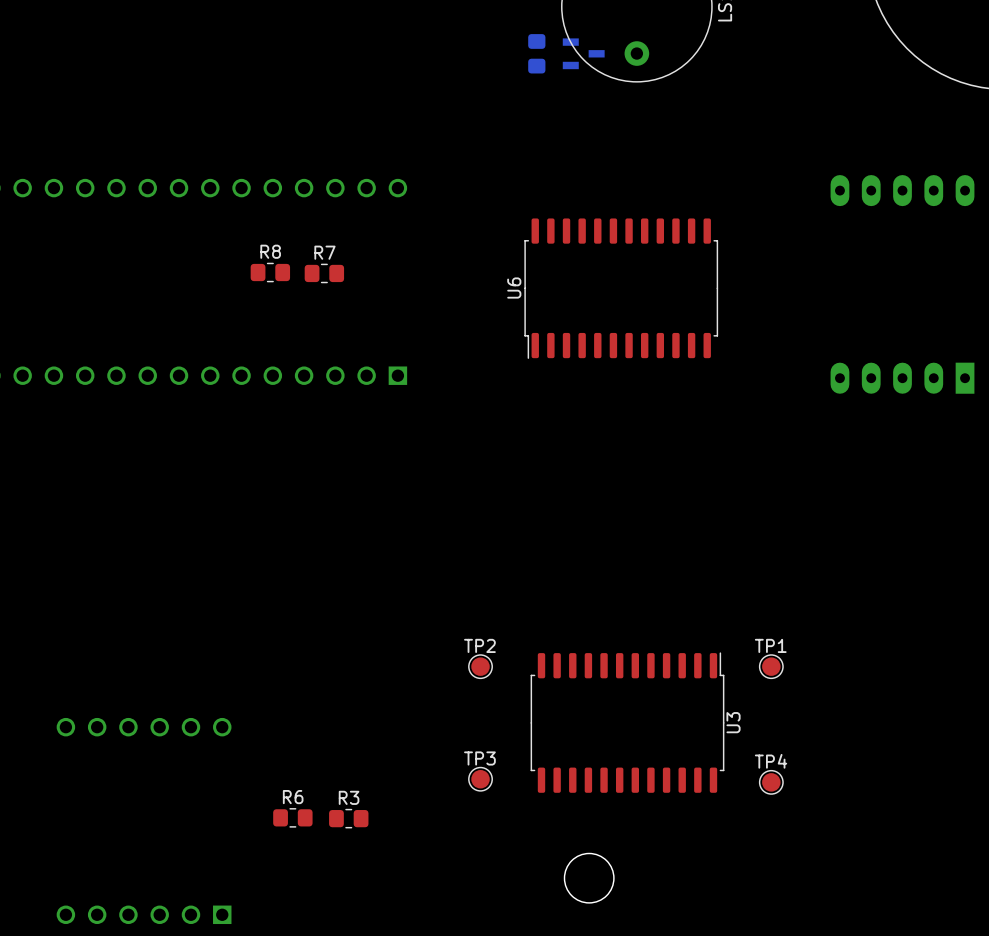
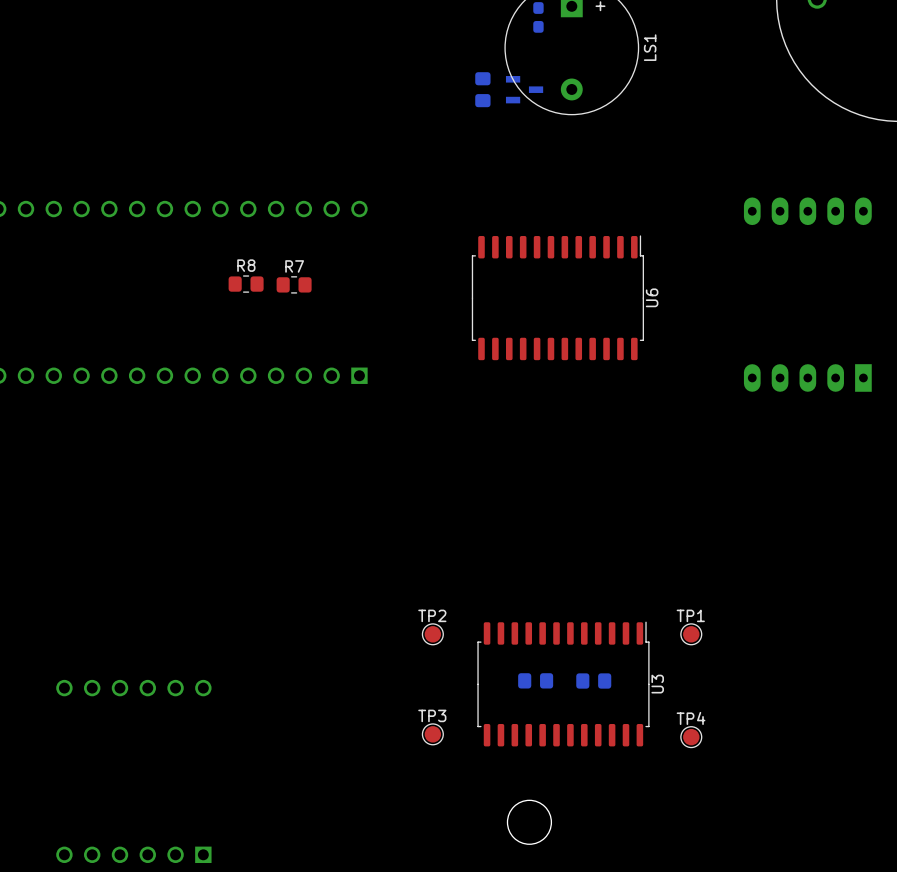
U6 rotation: 0° (621, 288) -> 180° (557, 297)
part: none -> (535, 680)
part: none -> (593, 681)
R6: (292, 817) -> none
R3: (348, 818) -> none

